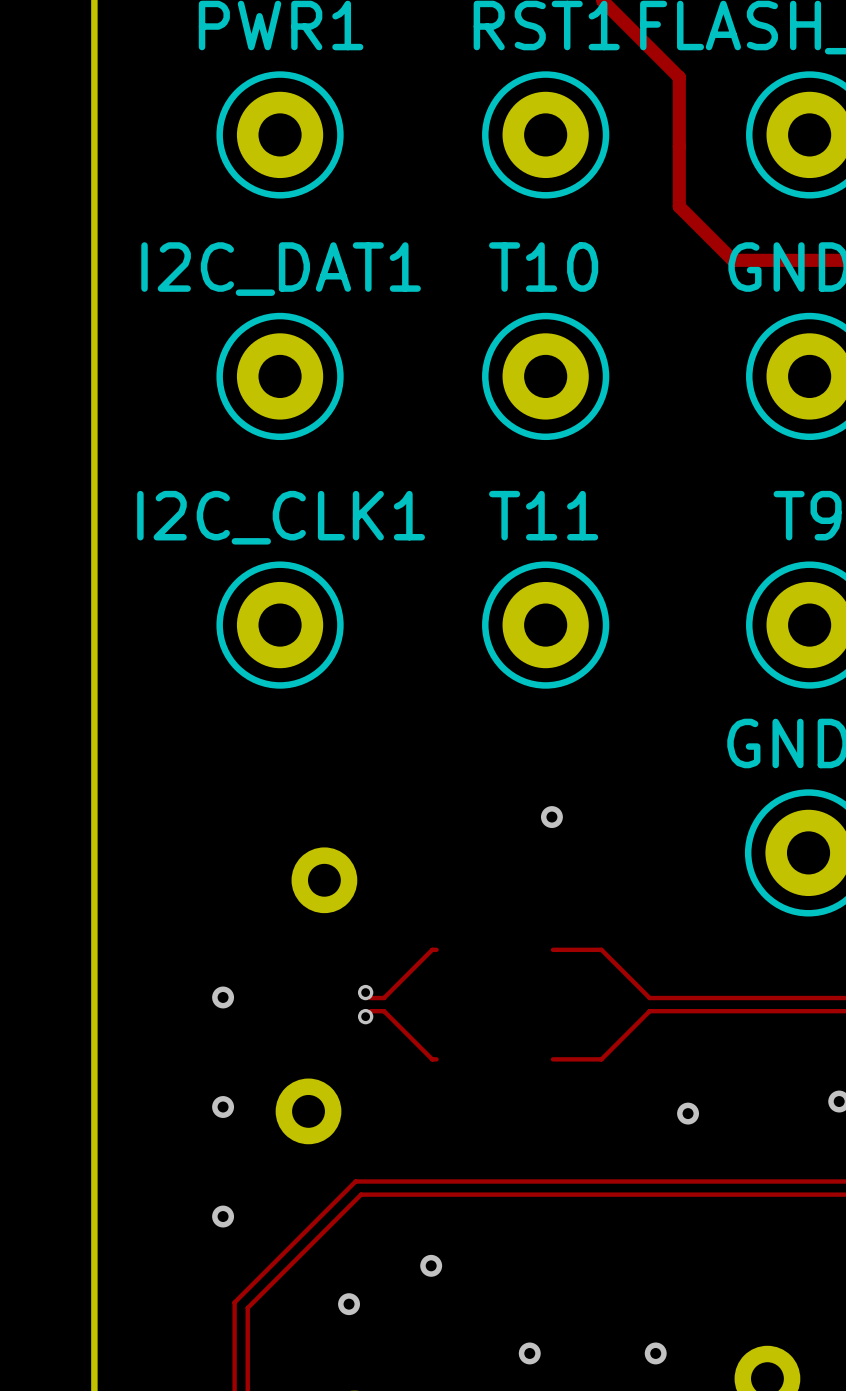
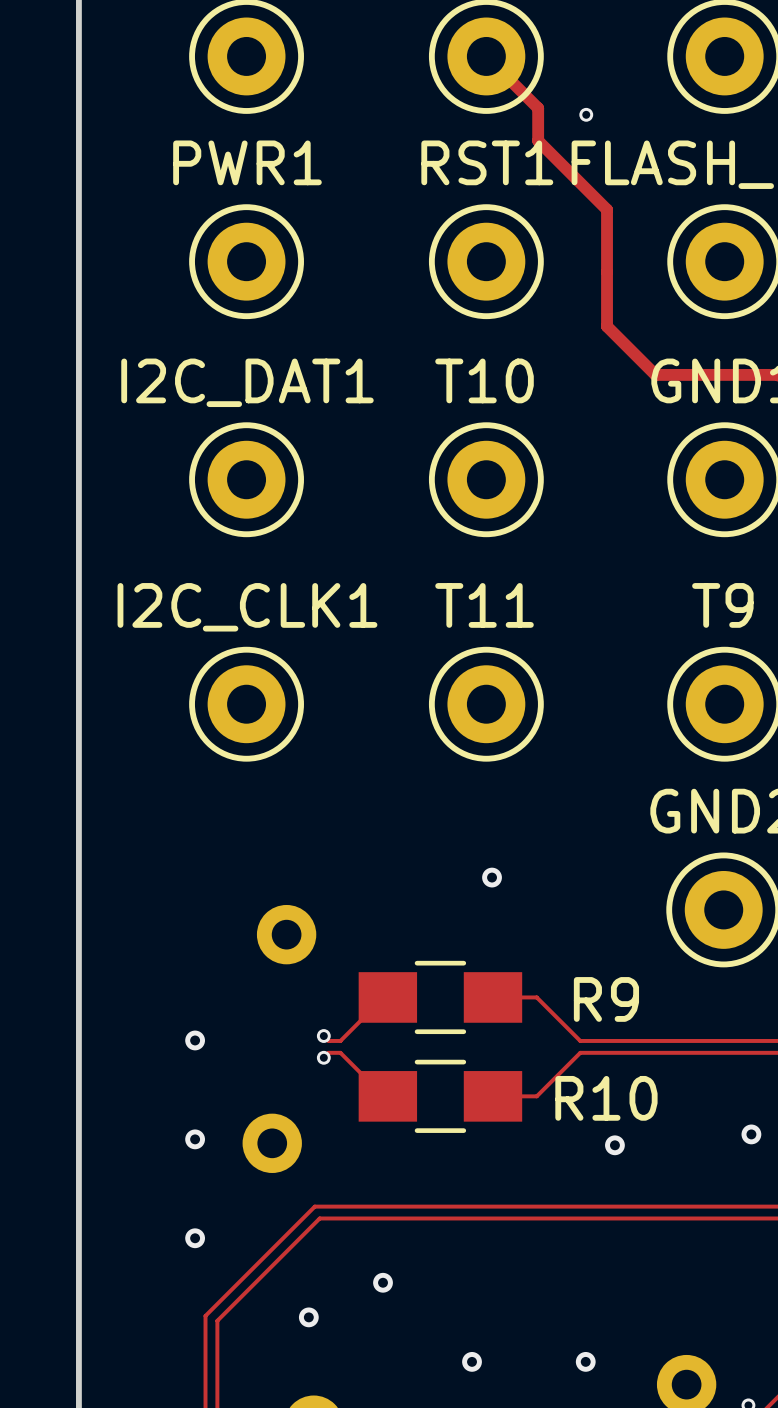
R9: none -> (440, 997)
R10: none -> (440, 1096)

